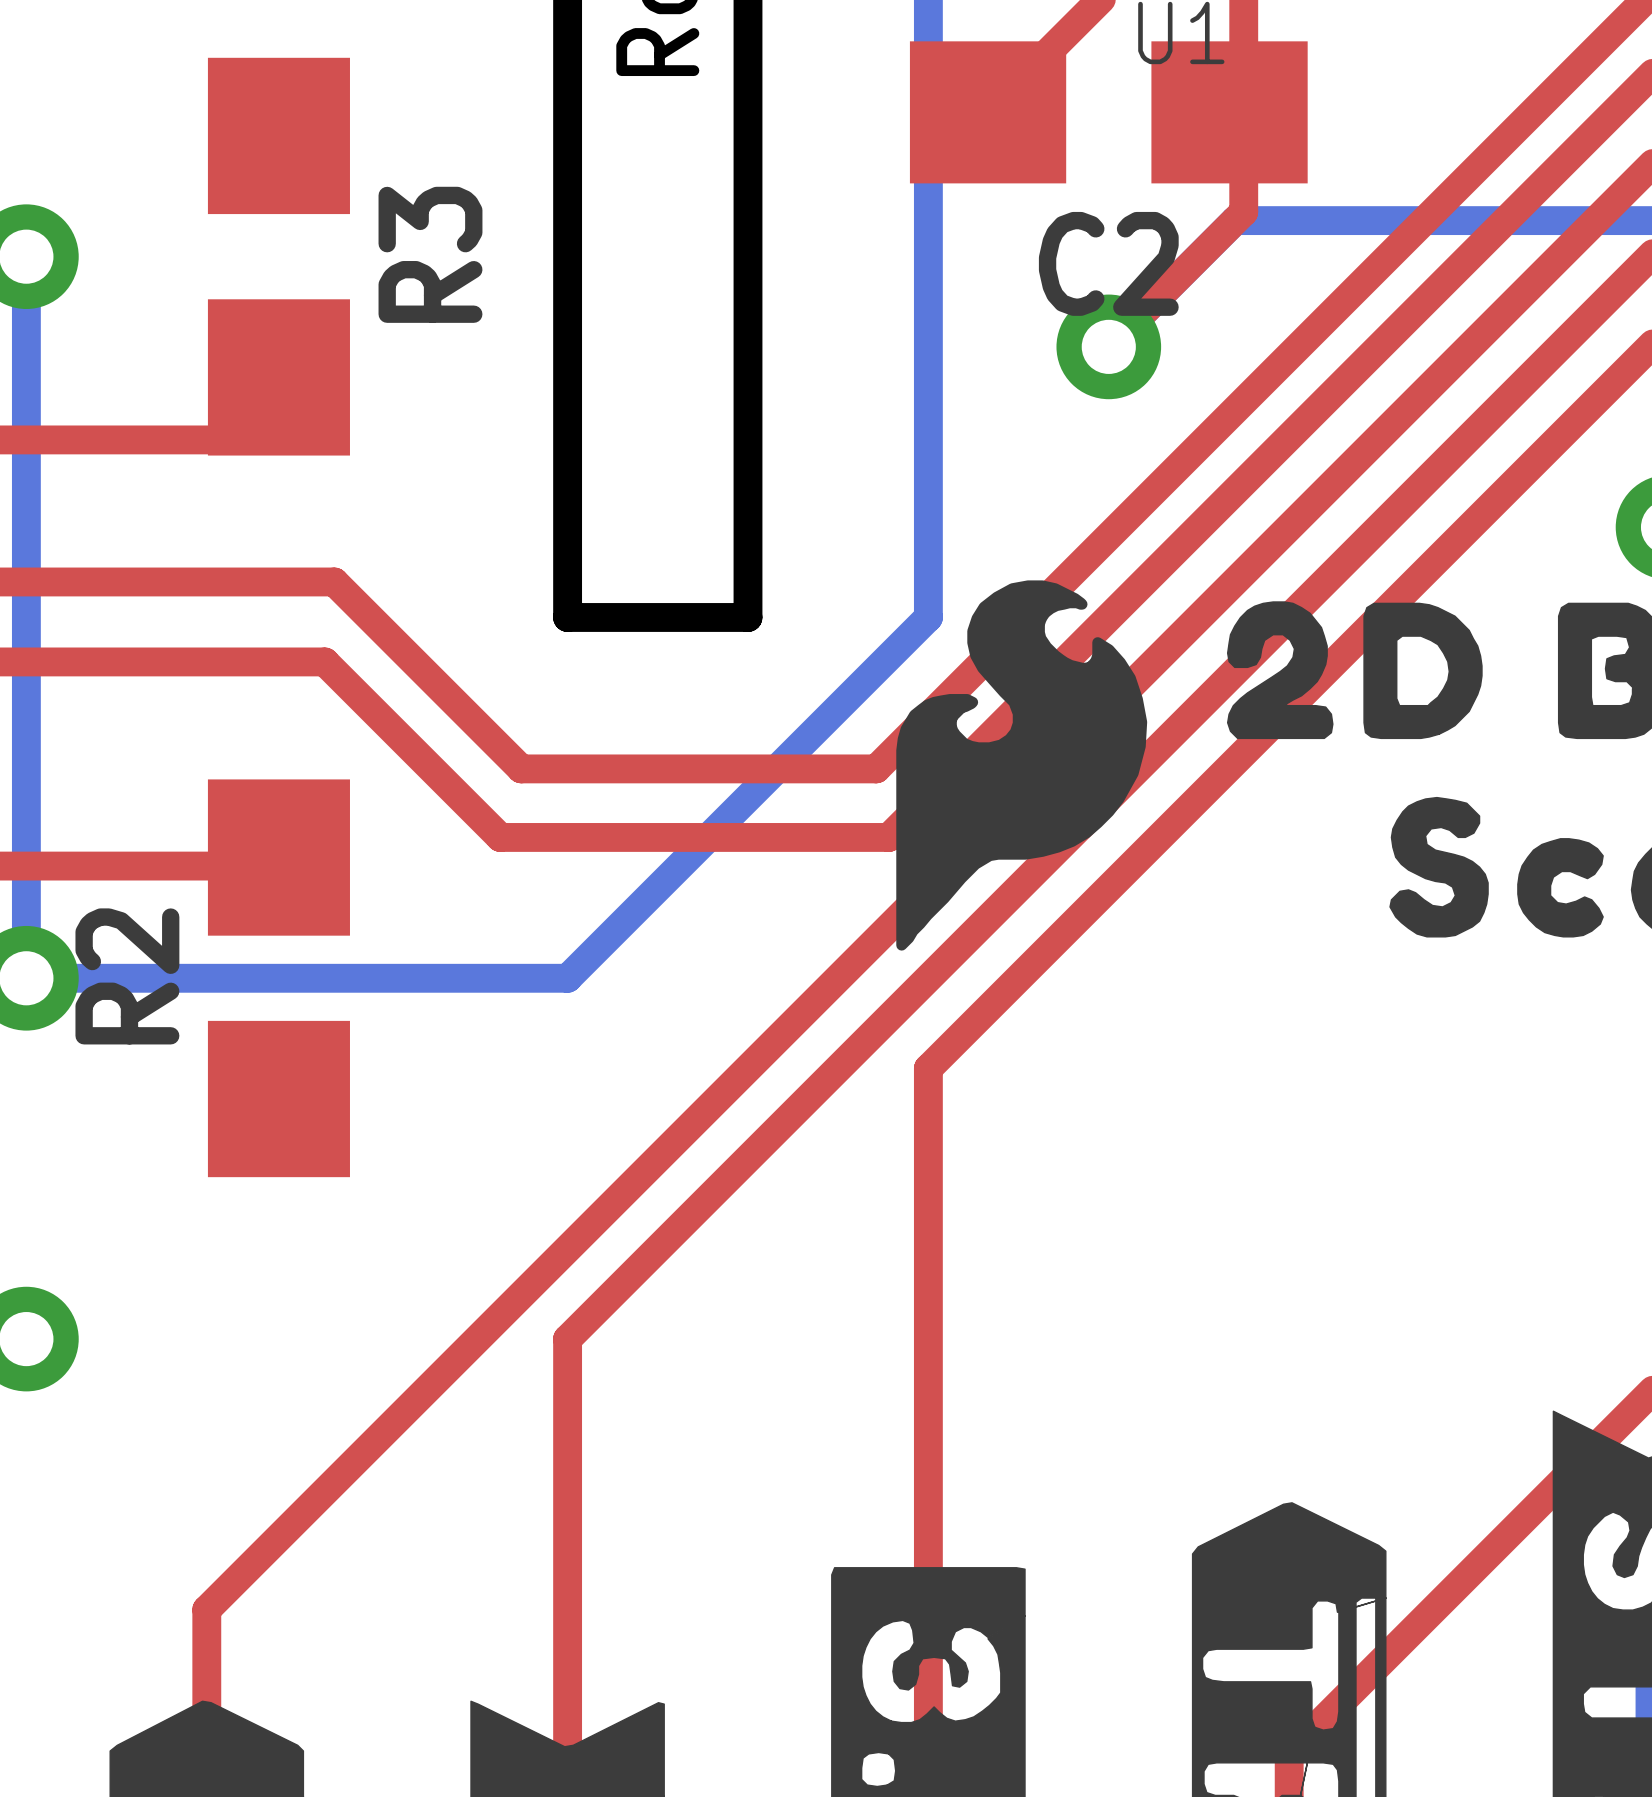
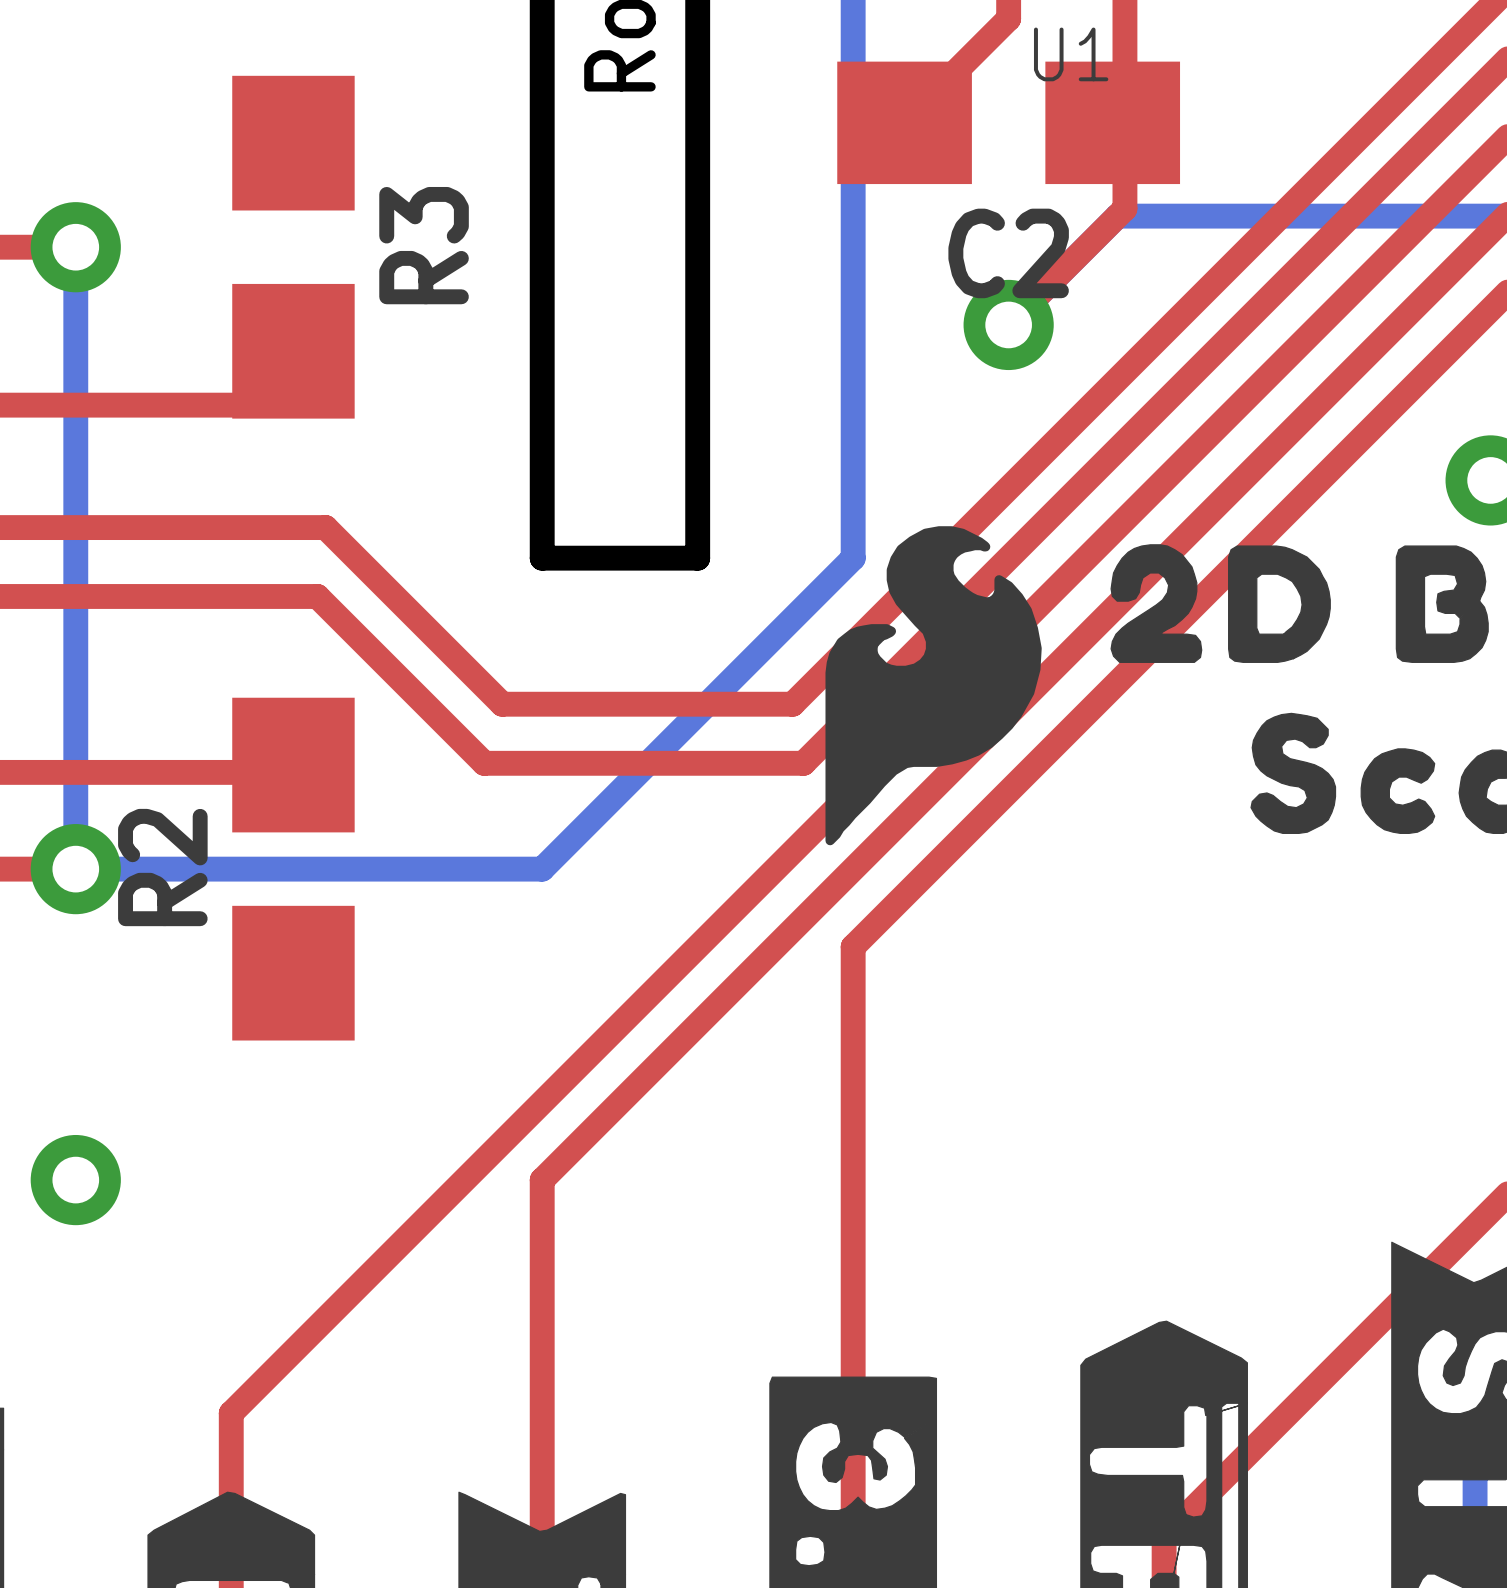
top track: (316, 581) (334, 581) (521, 768) (876, 768) -> (325, 527) (502, 704) (792, 704) (808, 688)
top track: (306, 661) (324, 661) (500, 837) (888, 837) -> (317, 596) (484, 763) (803, 763) (819, 747)

